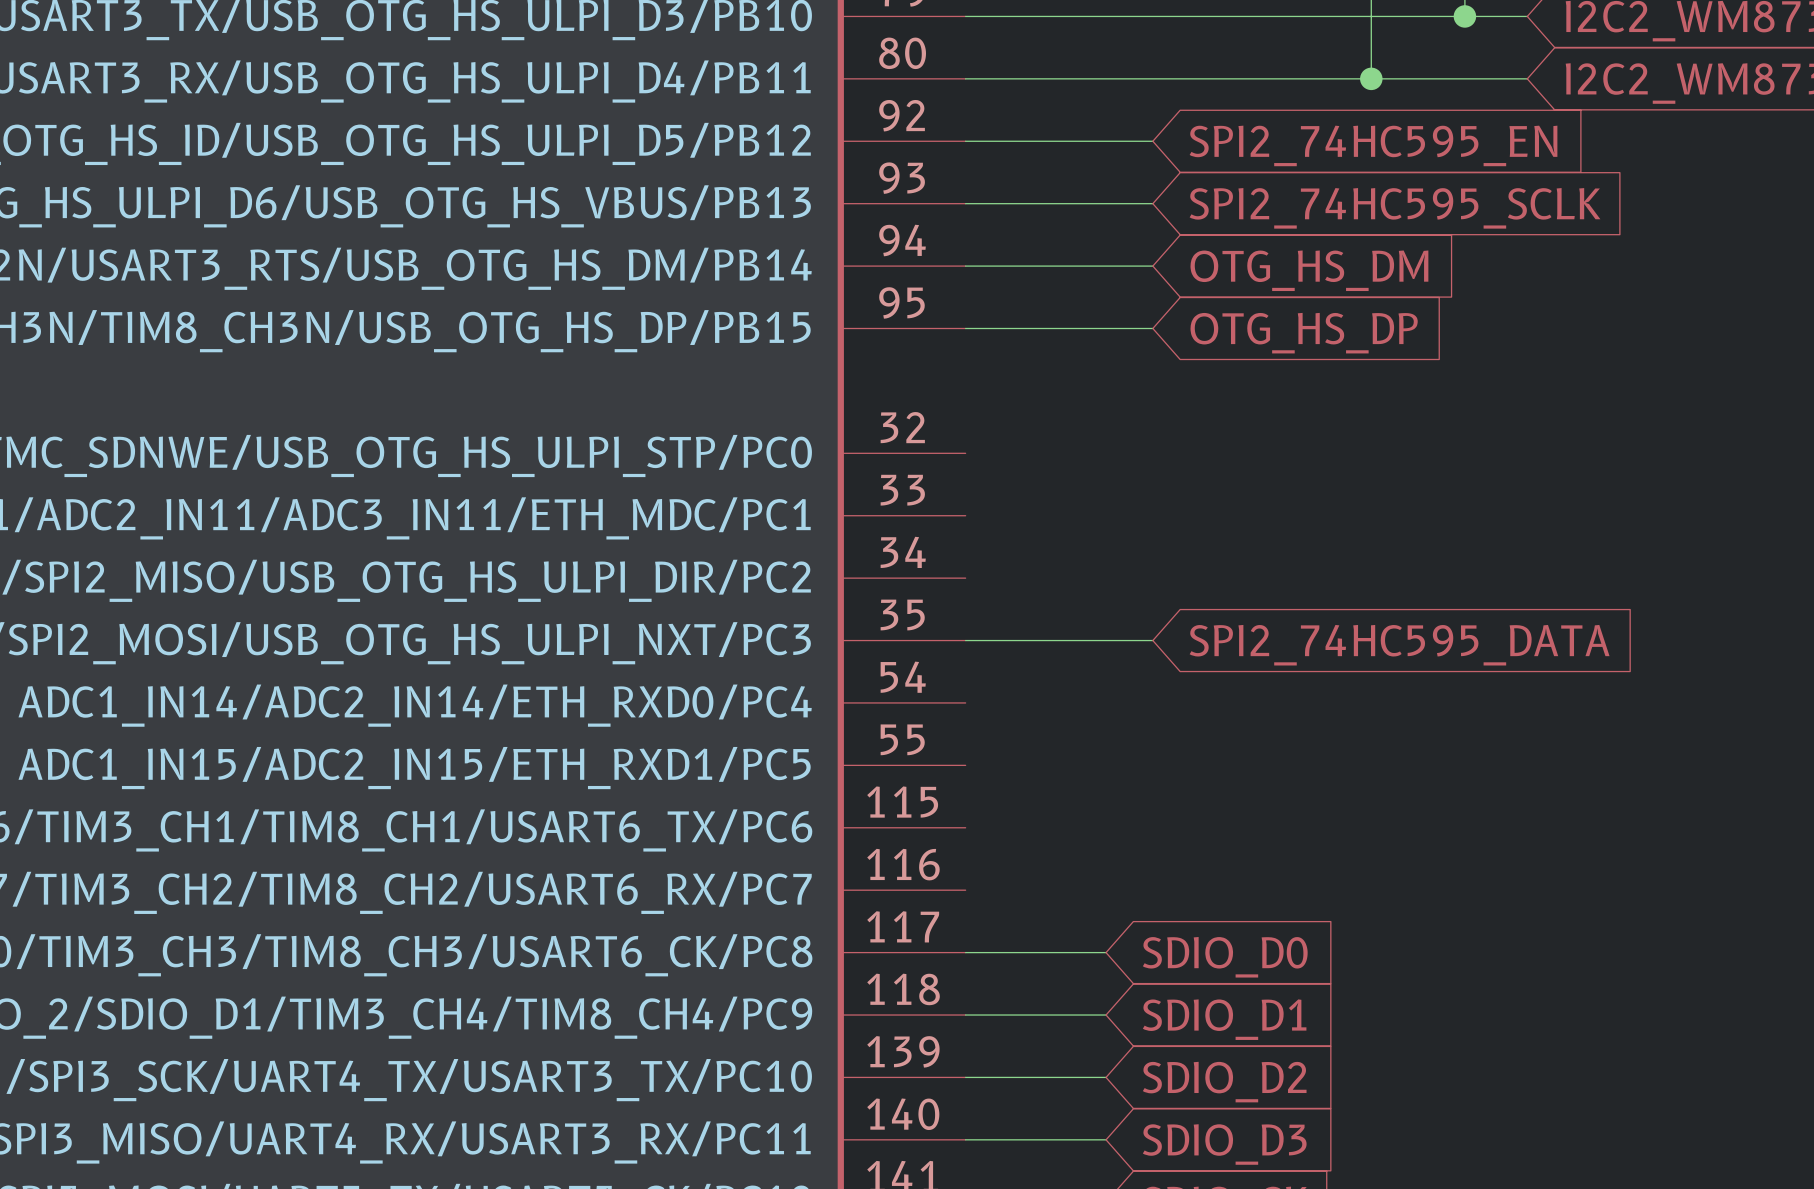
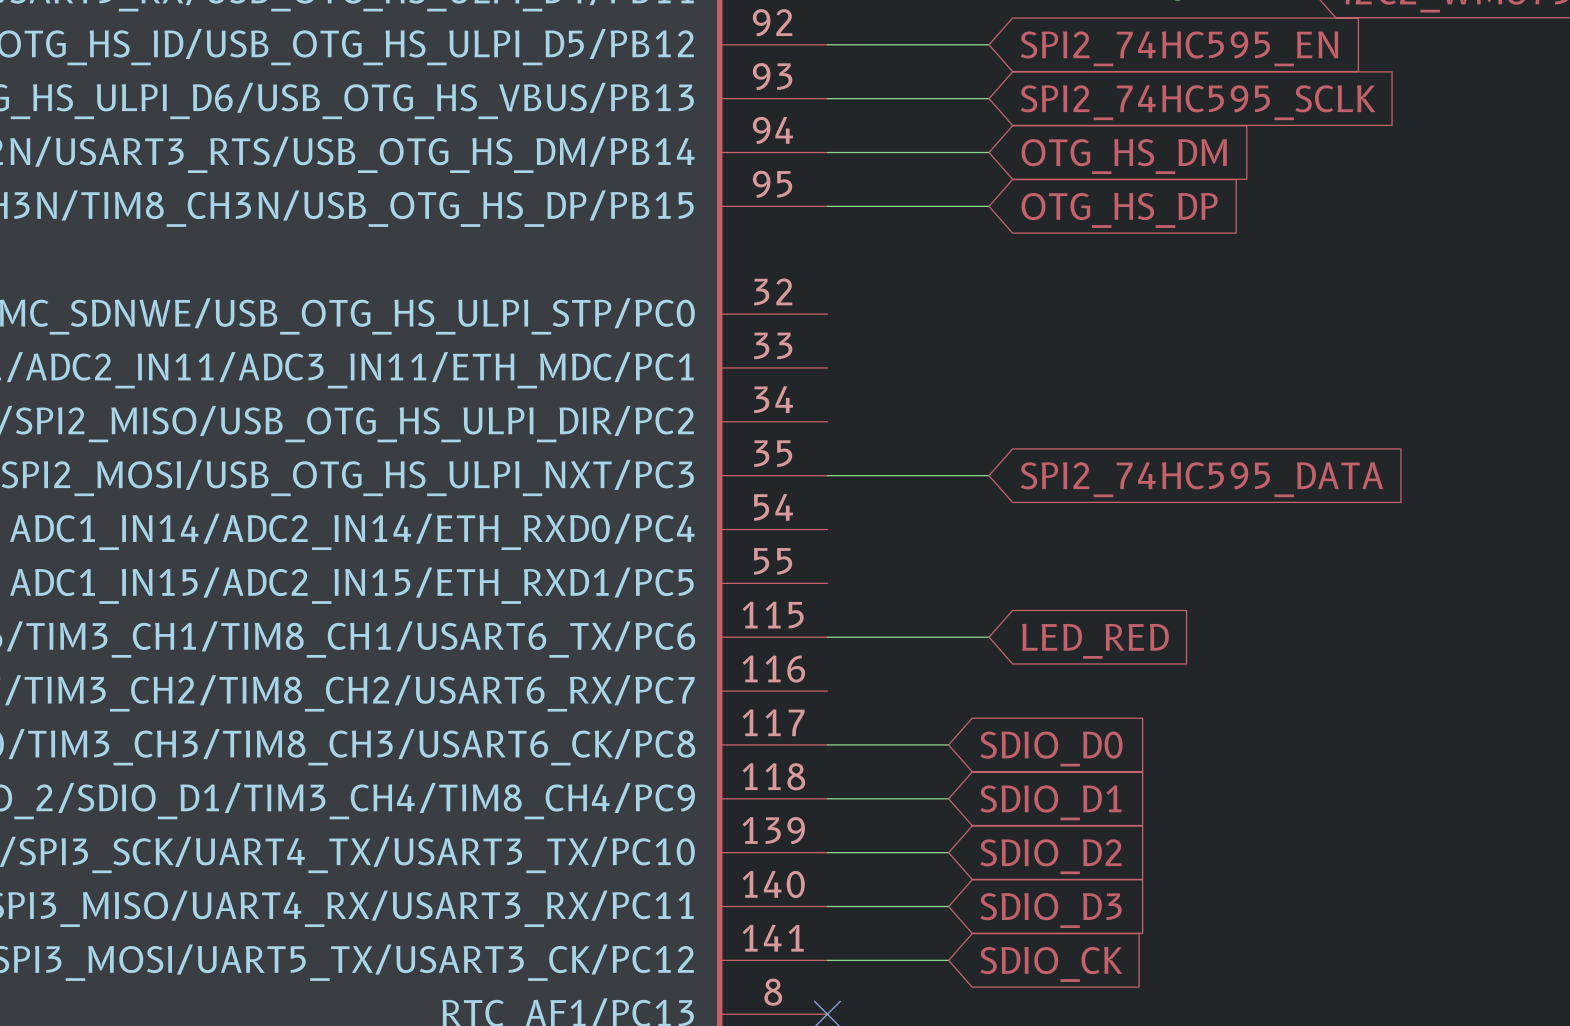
wire: none -> (827, 637) (989, 637)
global label: none -> LED_RED (1095, 641)

